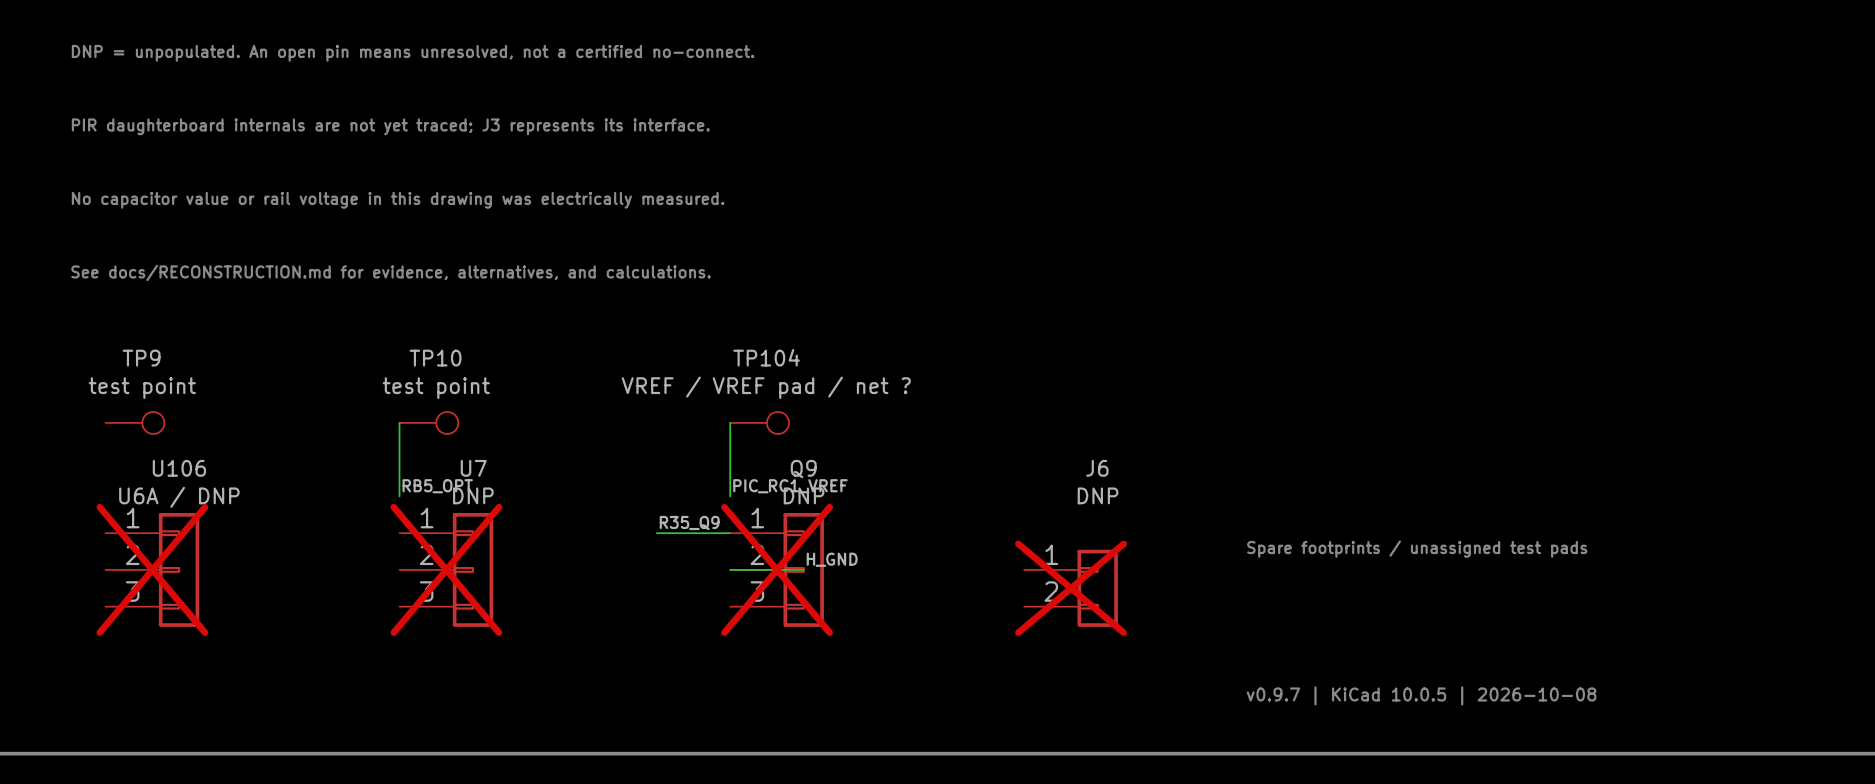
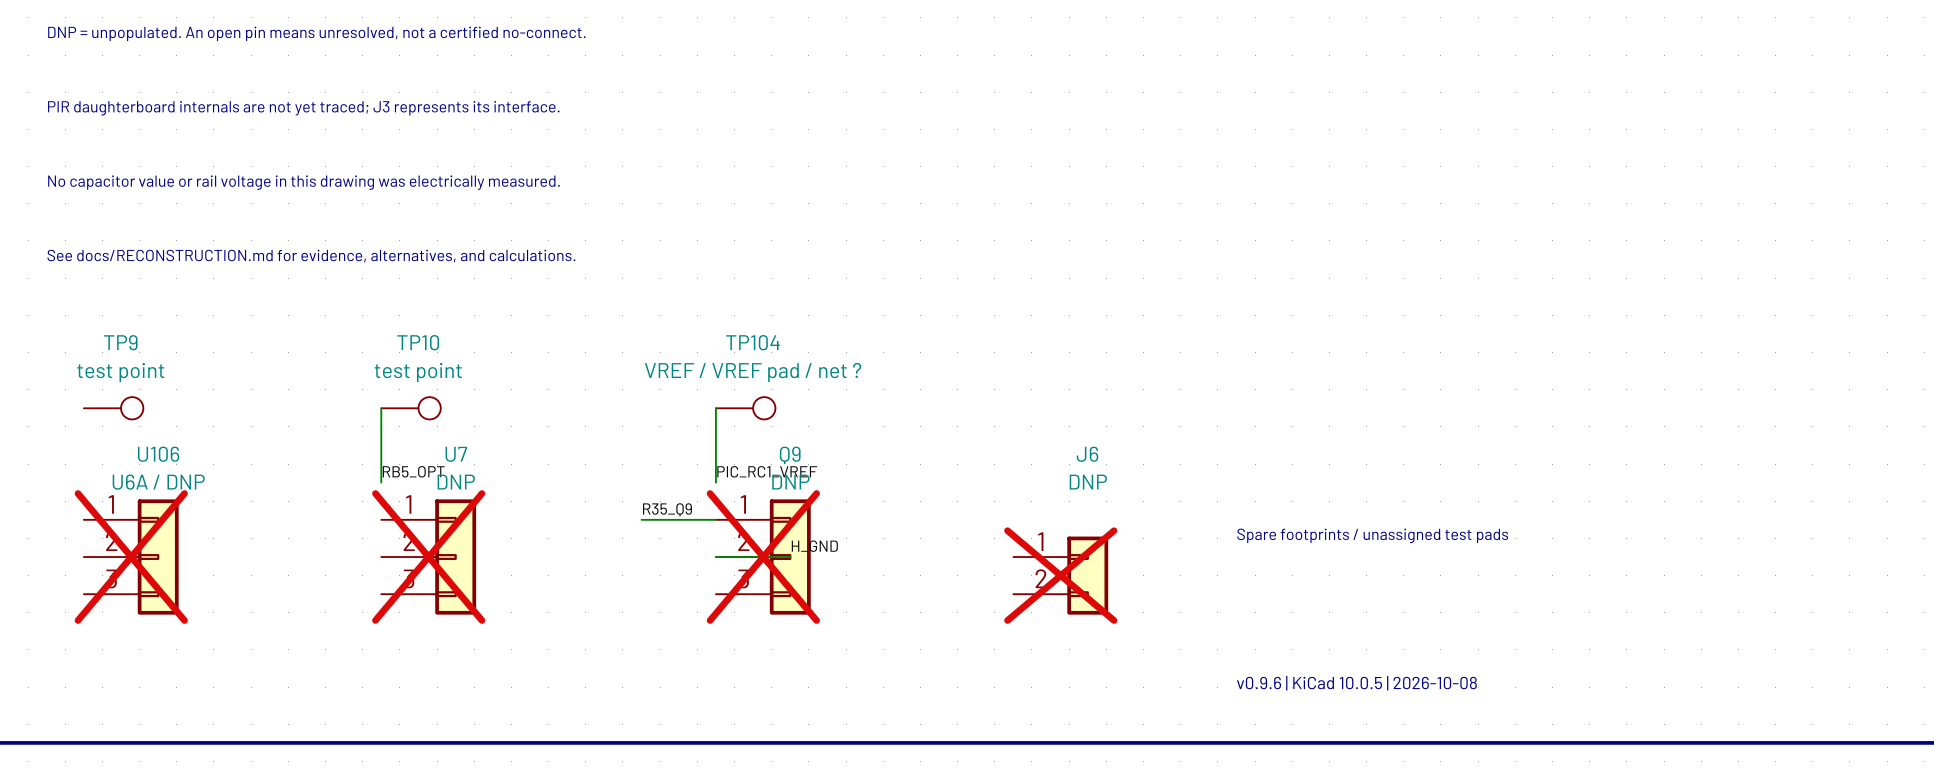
text: v0.9.7 | KiCad 10.0.5 | 2026-10-08 (1421, 695) -> v0.9.6 | KiCad 10.0.5 | 2026-10-08 (1356, 683)

